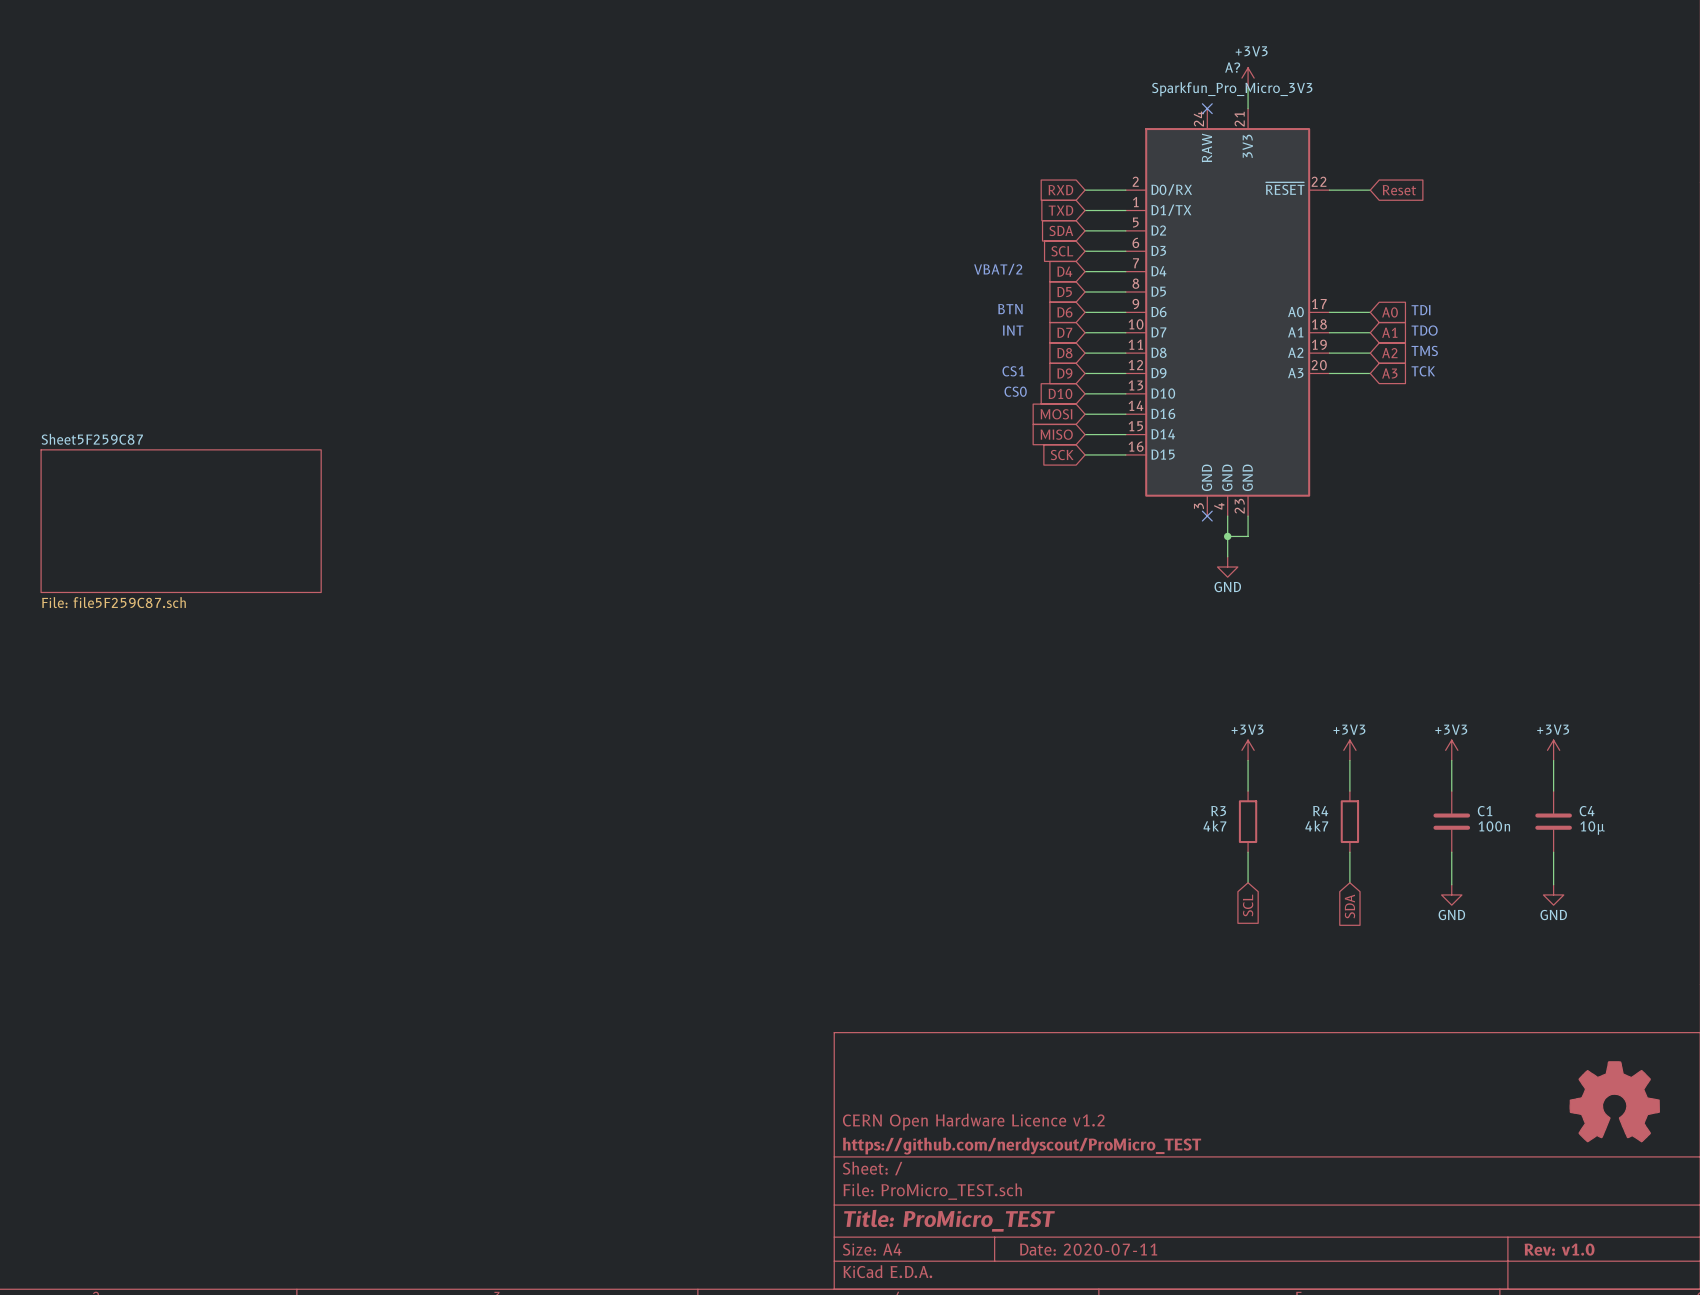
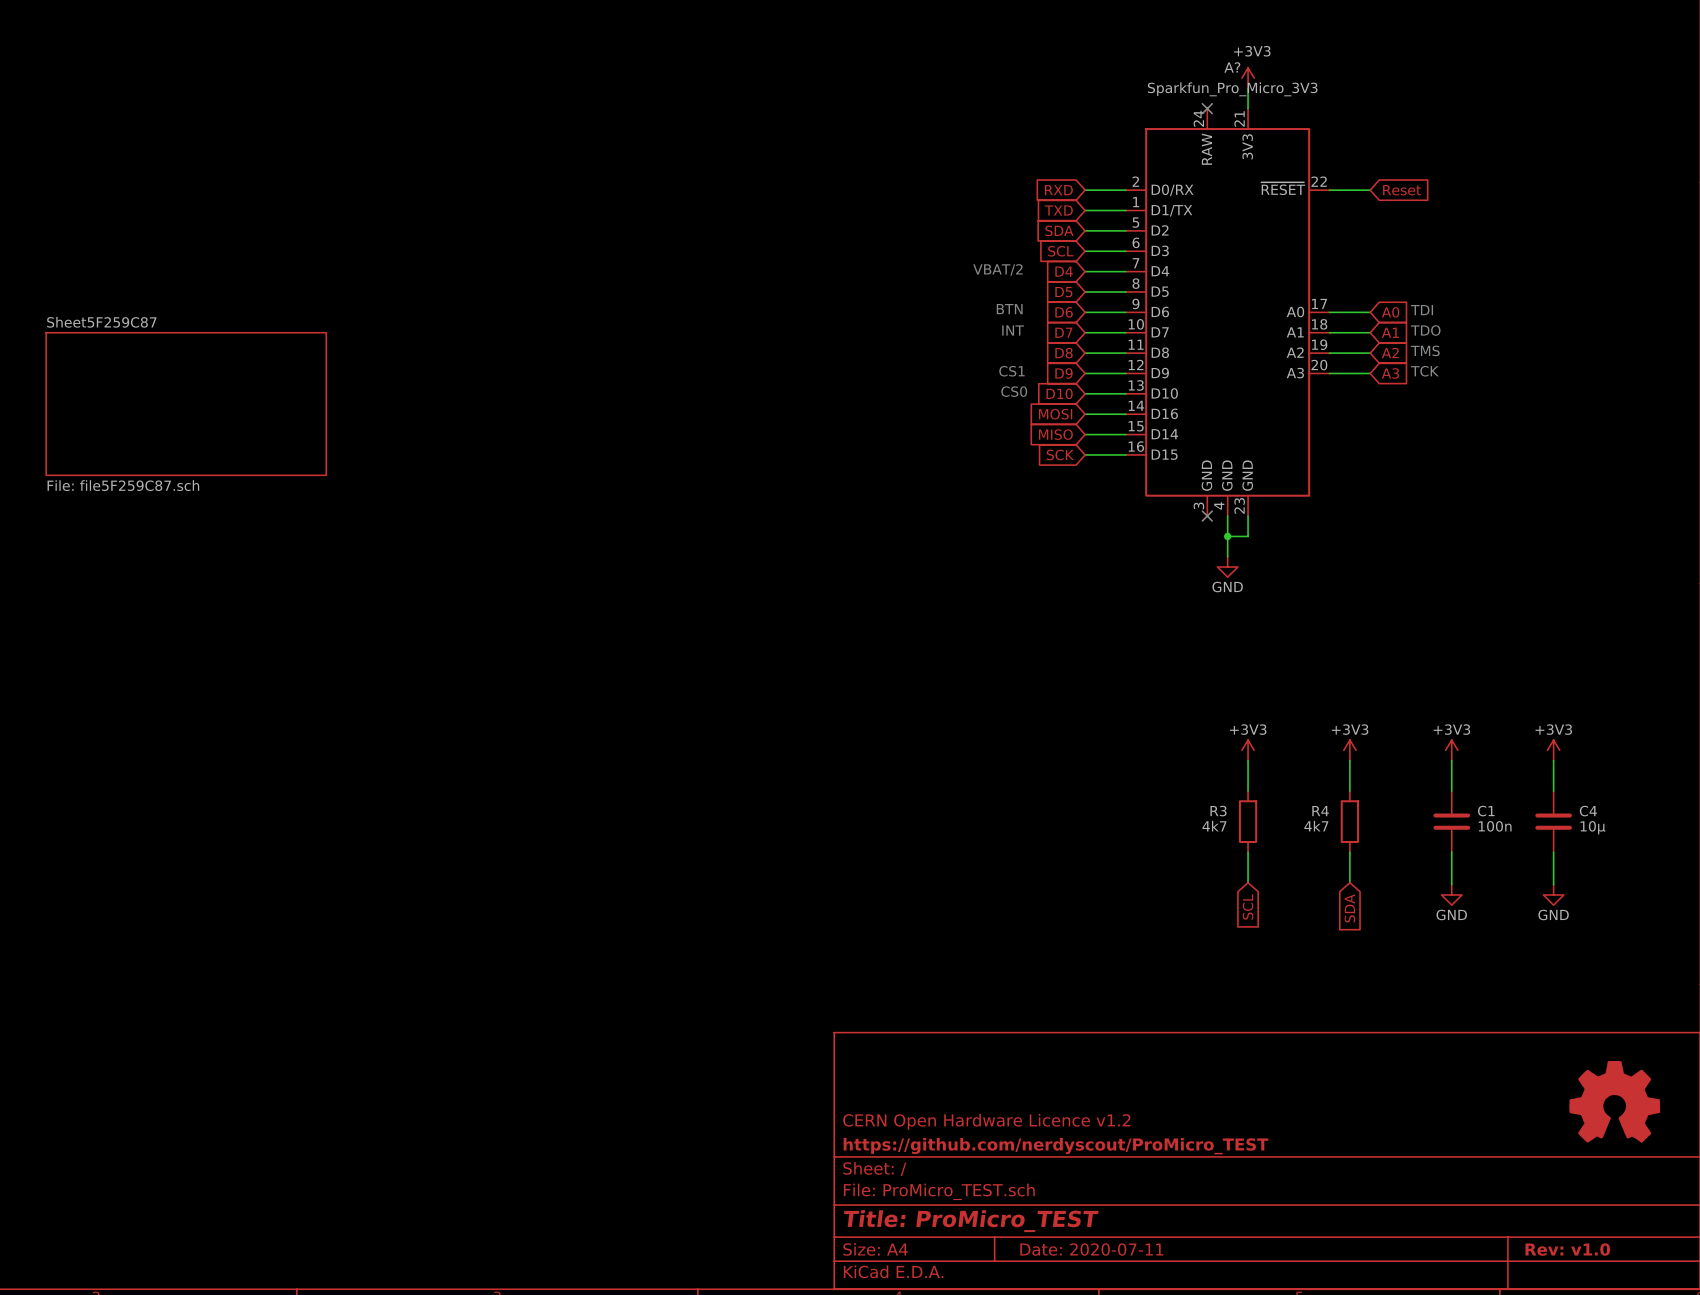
sheet Sheet5F259C87 position: (181, 521) -> (186, 404)

